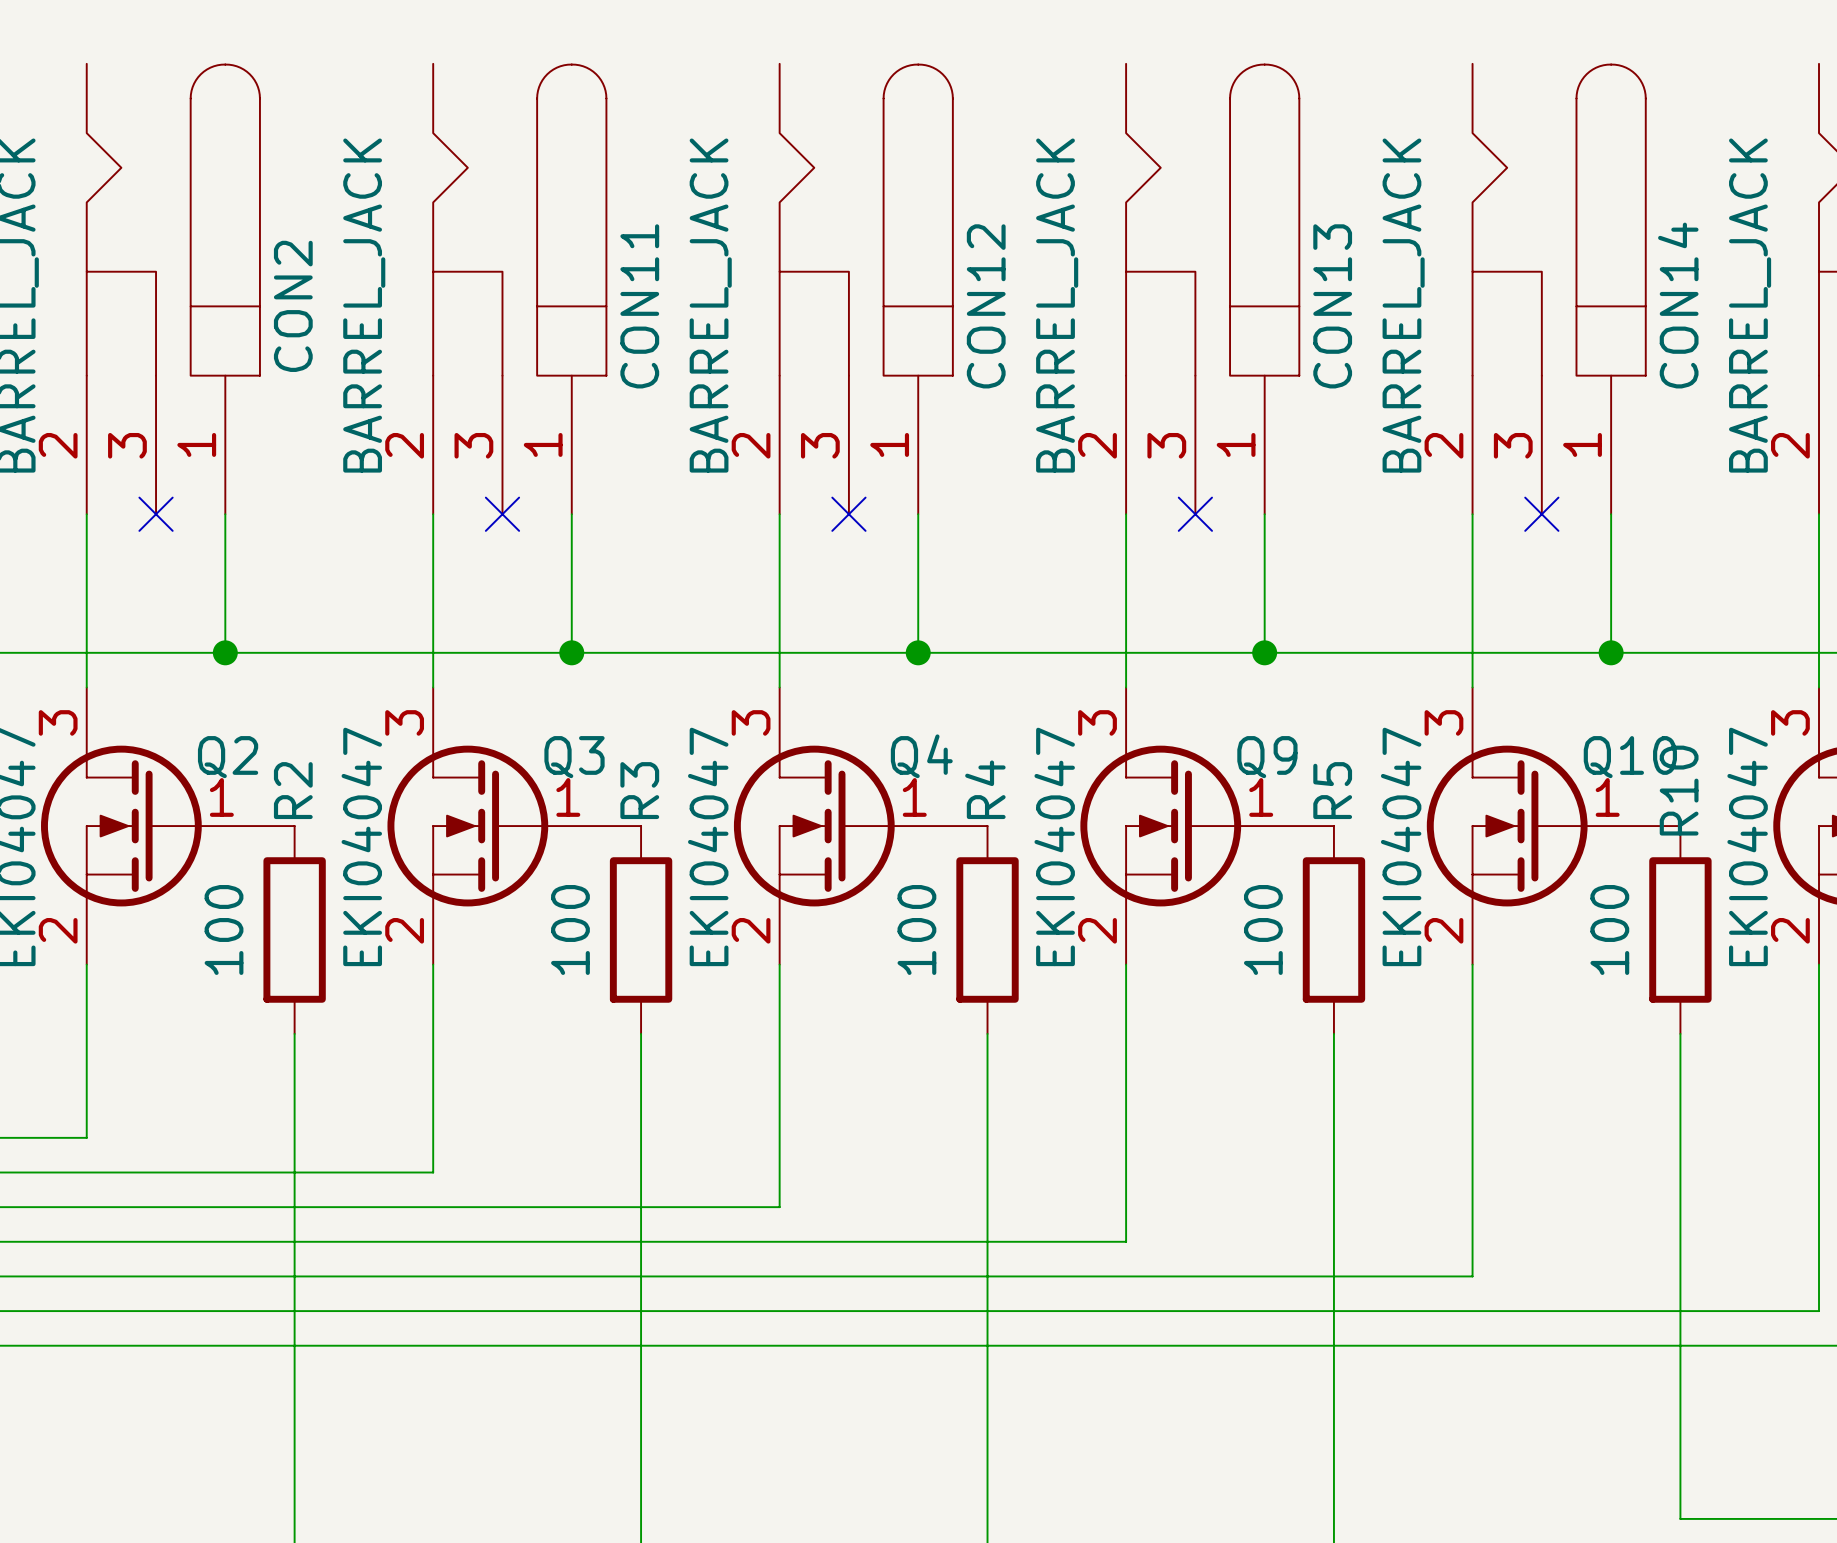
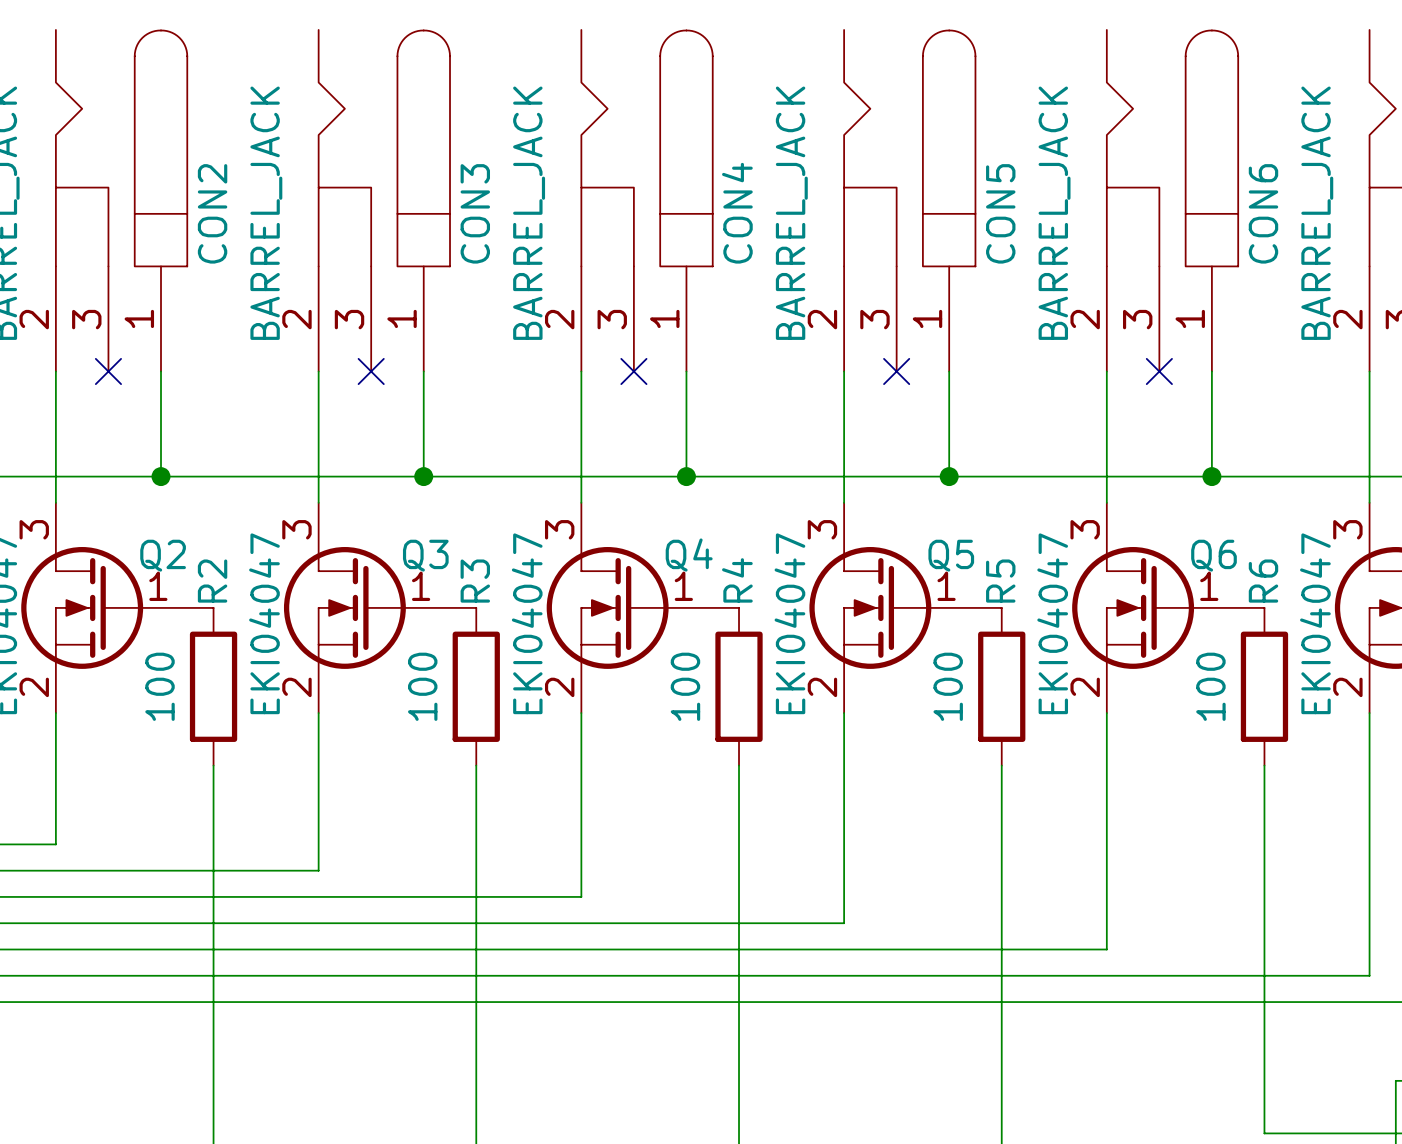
CON14 name: CON14 (1678, 305) -> CON6 (1263, 213)
CON11 name: CON11 (639, 306) -> CON3 (475, 213)
CON12 name: CON12 (986, 306) -> CON4 (737, 213)
CON13 name: CON13 (1332, 306) -> CON5 (1000, 213)
Q9 name: Q9 (1267, 757) -> Q5 (951, 555)
Q10 name: Q10 (1630, 757) -> Q6 (1213, 555)
R10 name: R10 (1679, 790) -> R6 (1263, 581)

